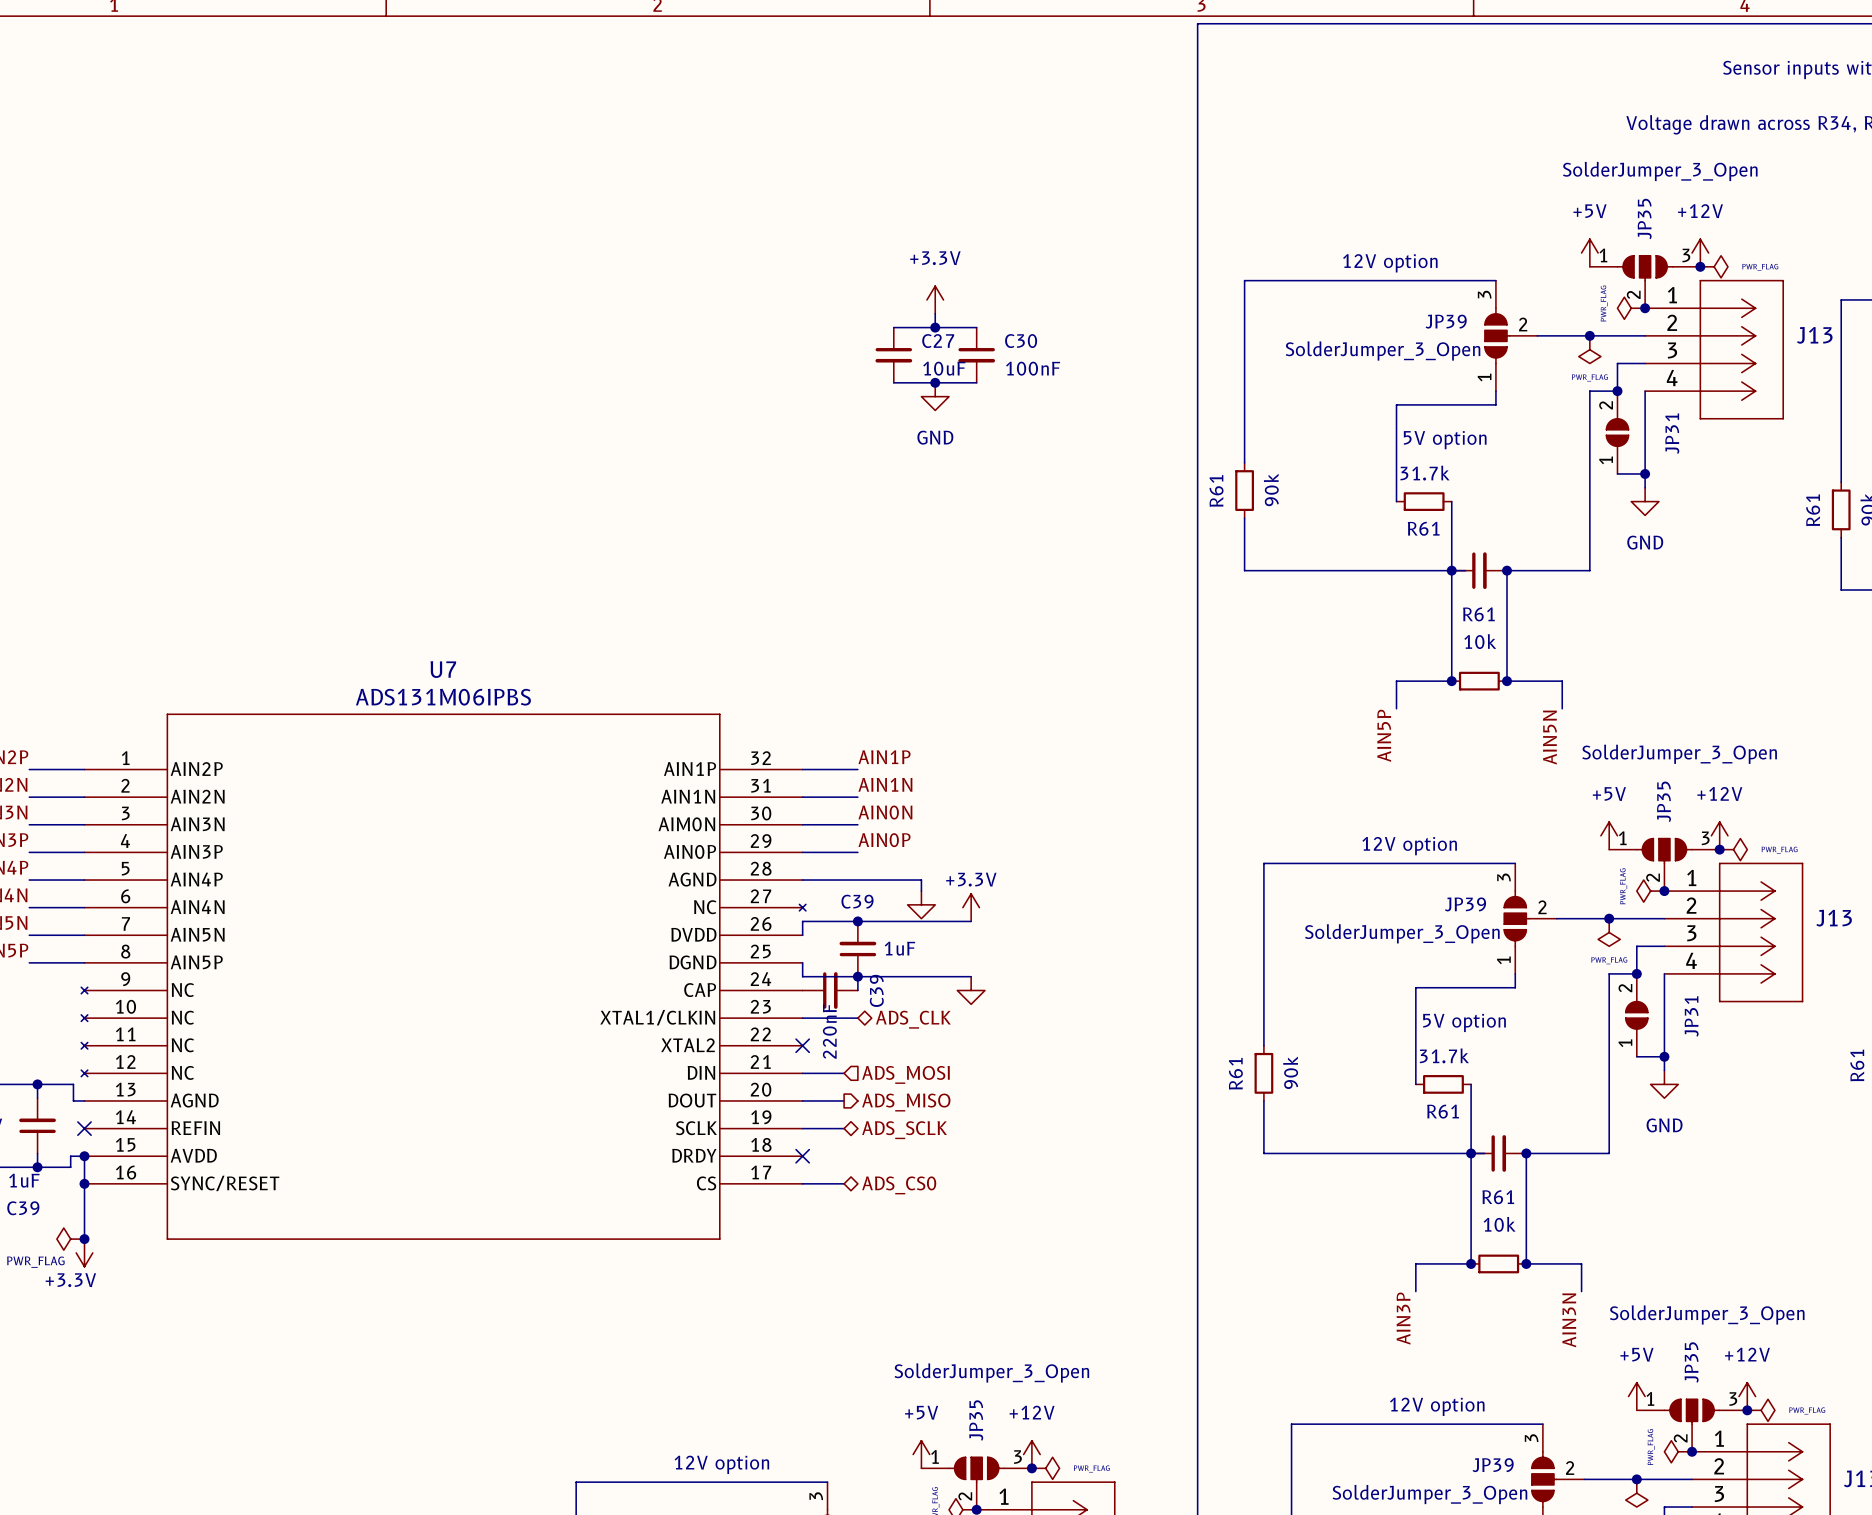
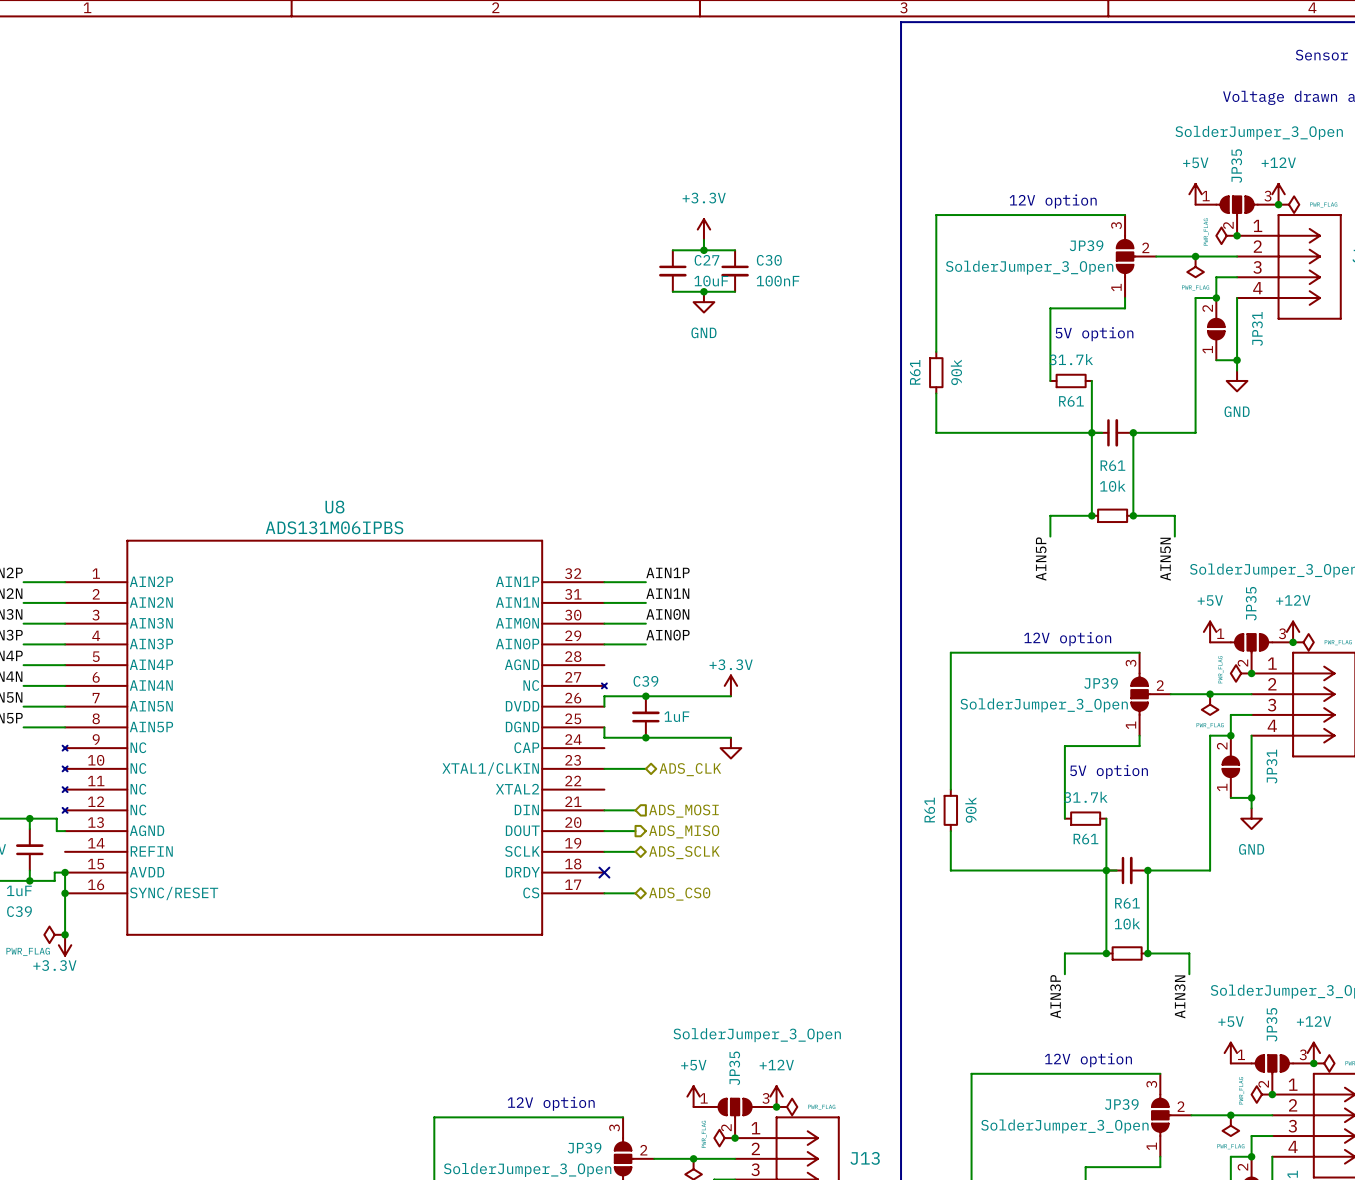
U7 name: U7 (443, 669) -> U8 (334, 507)
wire: (802, 880) (921, 880) (921, 891) -> none
power symbol: (921, 904) -> none
wire: (857, 976) (857, 990) -> none
C39: 220nF (830, 990) -> none
no-connect mark: (802, 1045) -> none
no-connect mark: (84, 1128) -> none

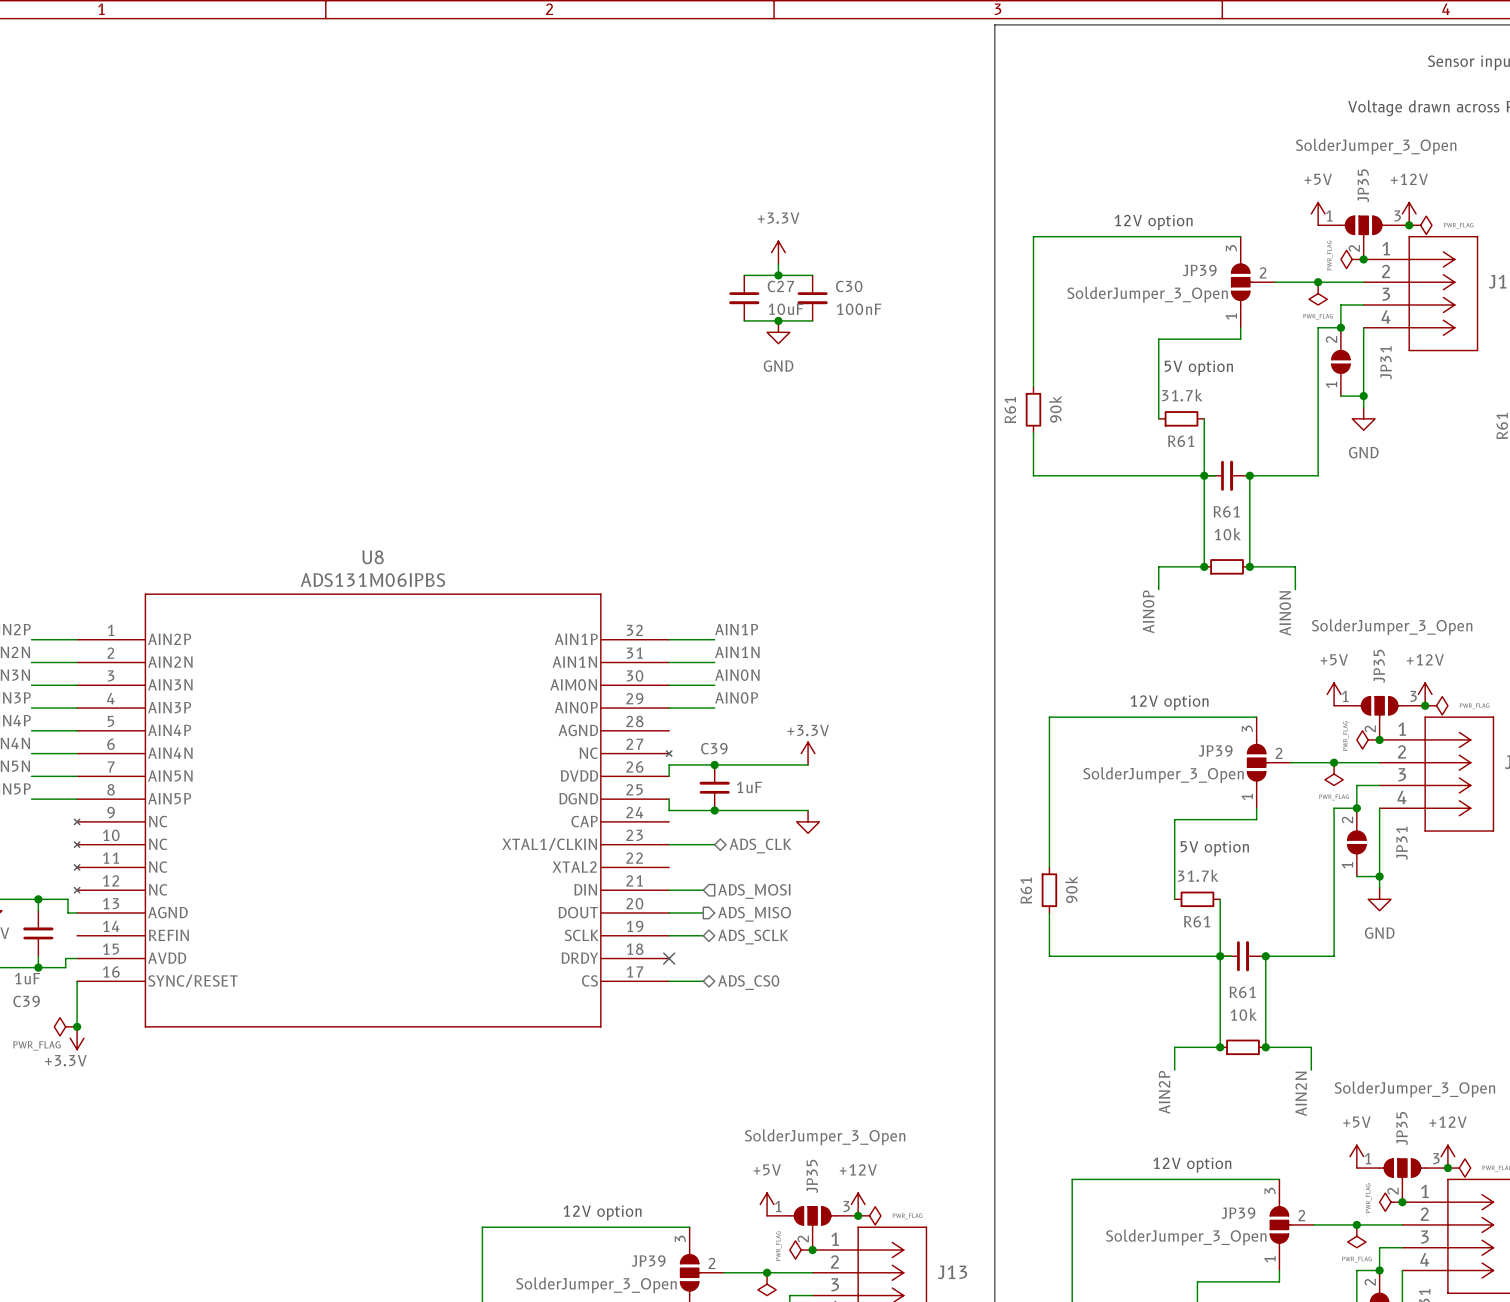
label: AIN5P (1041, 559) -> AIN0P (1148, 611)
label: AIN5N (1165, 559) -> AIN0N (1285, 613)
wire: (65, 872) (65, 893) -> none
junction: (65, 872) -> none
junction: (65, 893) -> none
label: AIN3P (1055, 996) -> AIN2P (1164, 1092)
label: AIN3N (1180, 996) -> AIN2N (1301, 1093)

